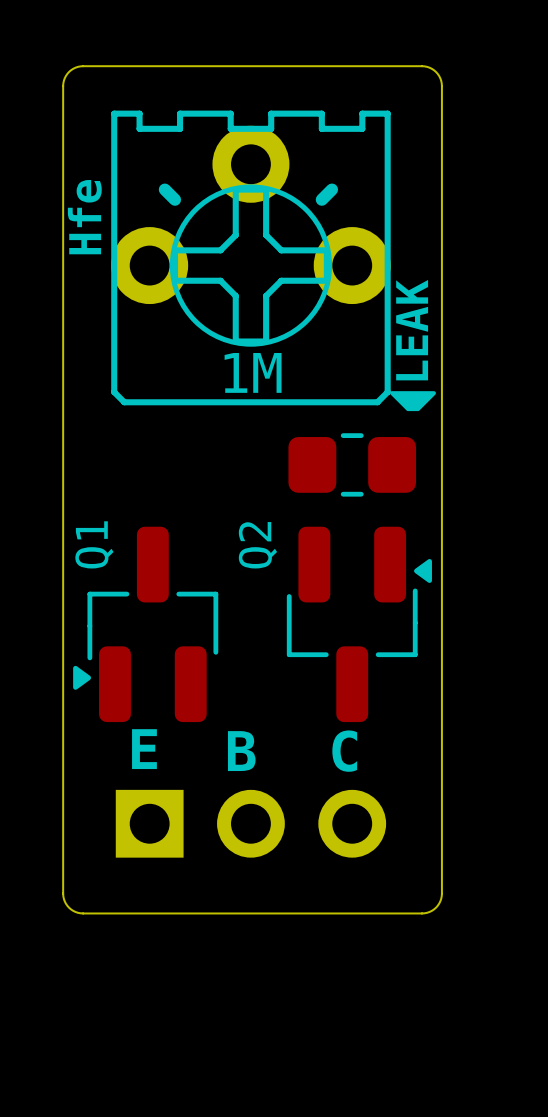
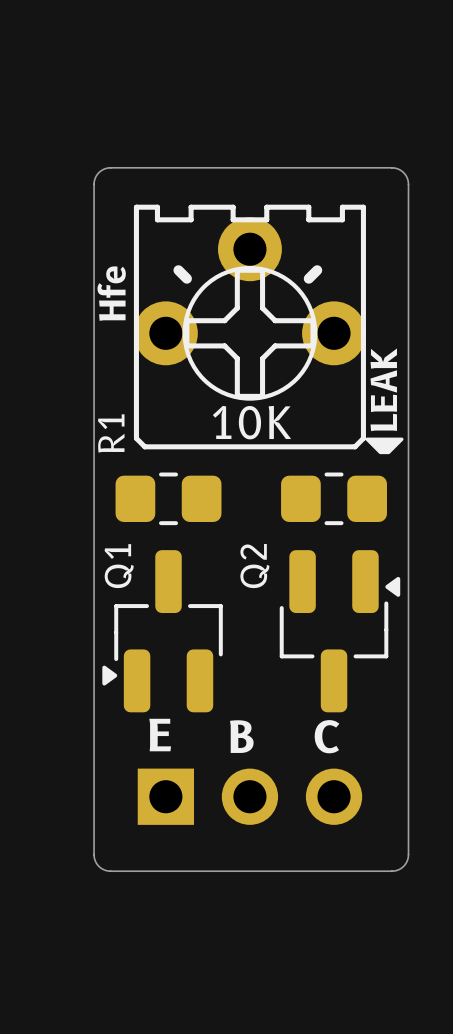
part value: 1M (253, 372) -> 10K (251, 422)
R1: none -> (168, 498)

